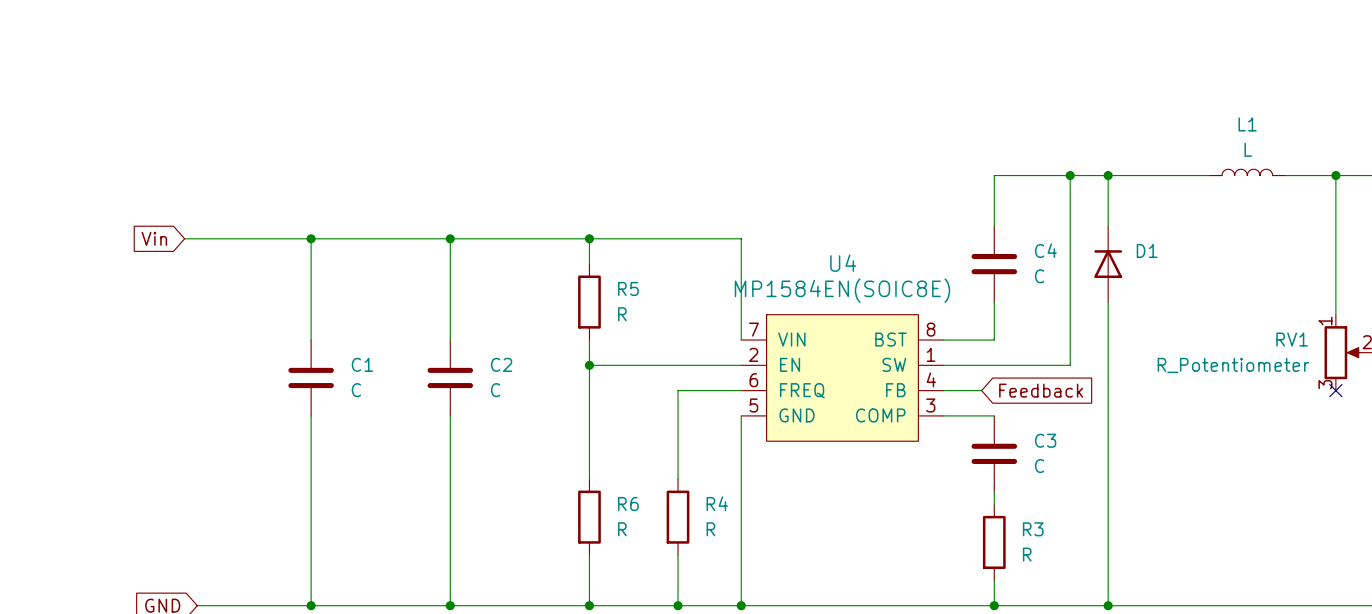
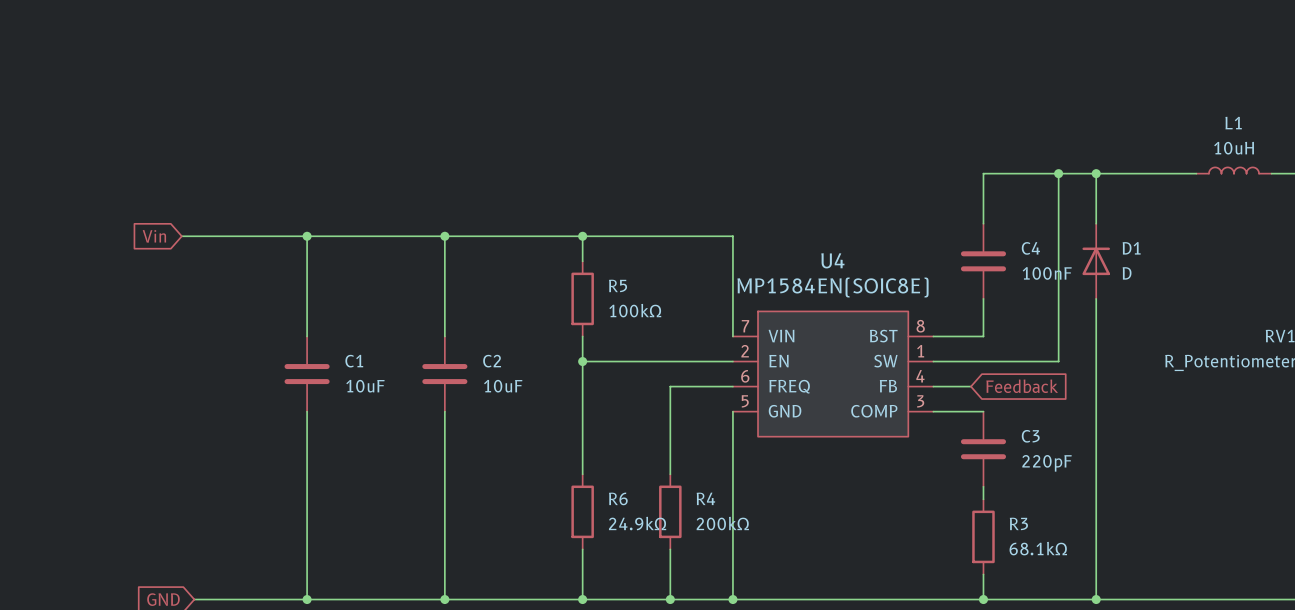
L1 value: L (1248, 149) -> 10uH (1234, 148)
C4 value: C (1039, 276) -> 100nF (1047, 273)
D1 value: none -> D (1127, 273)
R5 value: R (622, 314) -> 100kΩ (635, 310)
C1 value: C (356, 390) -> 10uF (365, 386)
C2 value: C (495, 390) -> 10uF (503, 386)
C3 value: C (1039, 466) -> 220pF (1047, 463)
R6 value: R (622, 529) -> 24.9kΩ (637, 523)
R4 value: R (710, 529) -> 200kΩ (722, 523)
R3 value: R (1027, 554) -> 68.1kΩ (1038, 548)

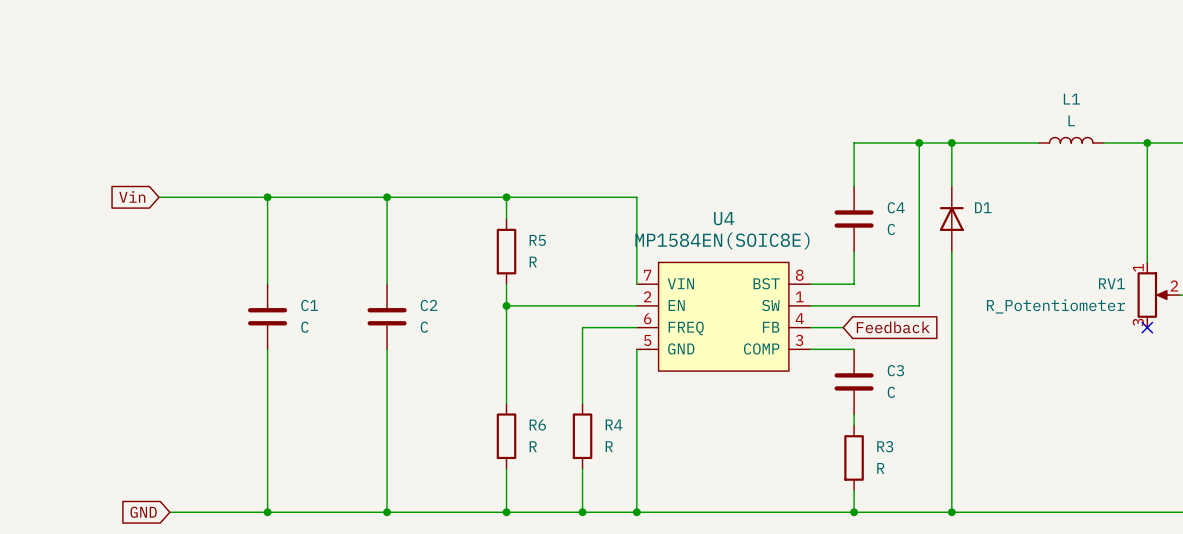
L1 value: 10uH (1234, 148) -> L (1071, 120)
C4 value: 100nF (1047, 273) -> C (891, 229)
D1 value: D (1127, 273) -> none
R5 value: 100kΩ (635, 310) -> R (533, 262)
C1 value: 10uF (365, 386) -> C (304, 327)
C2 value: 10uF (503, 386) -> C (424, 327)
C3 value: 220pF (1047, 463) -> C (891, 392)
R6 value: 24.9kΩ (637, 523) -> R (533, 446)
R4 value: 200kΩ (722, 523) -> R (609, 446)
R3 value: 68.1kΩ (1038, 548) -> R (880, 468)

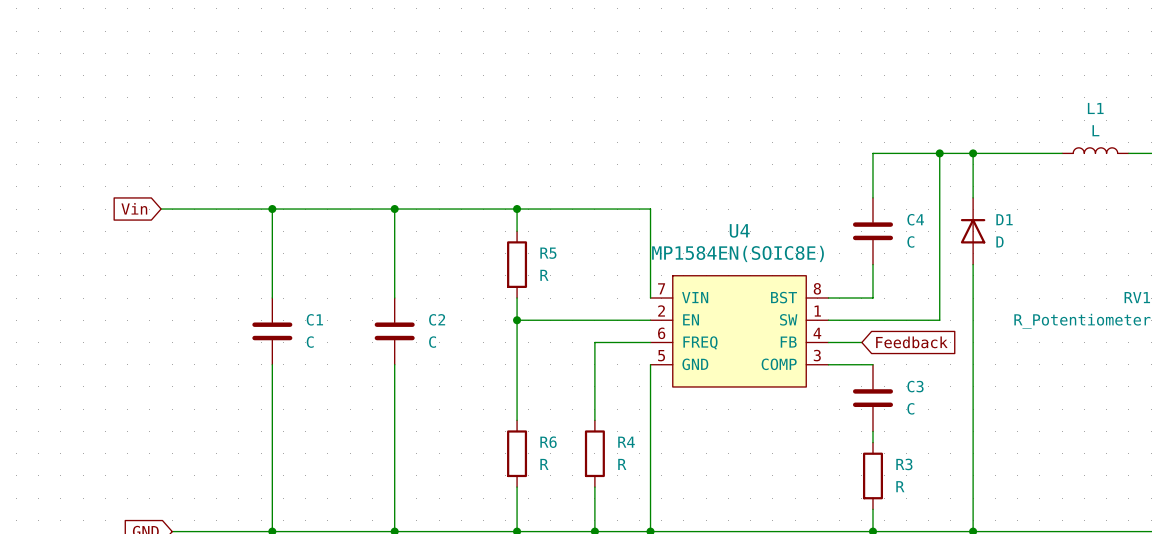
D1 value: none -> D (999, 241)

